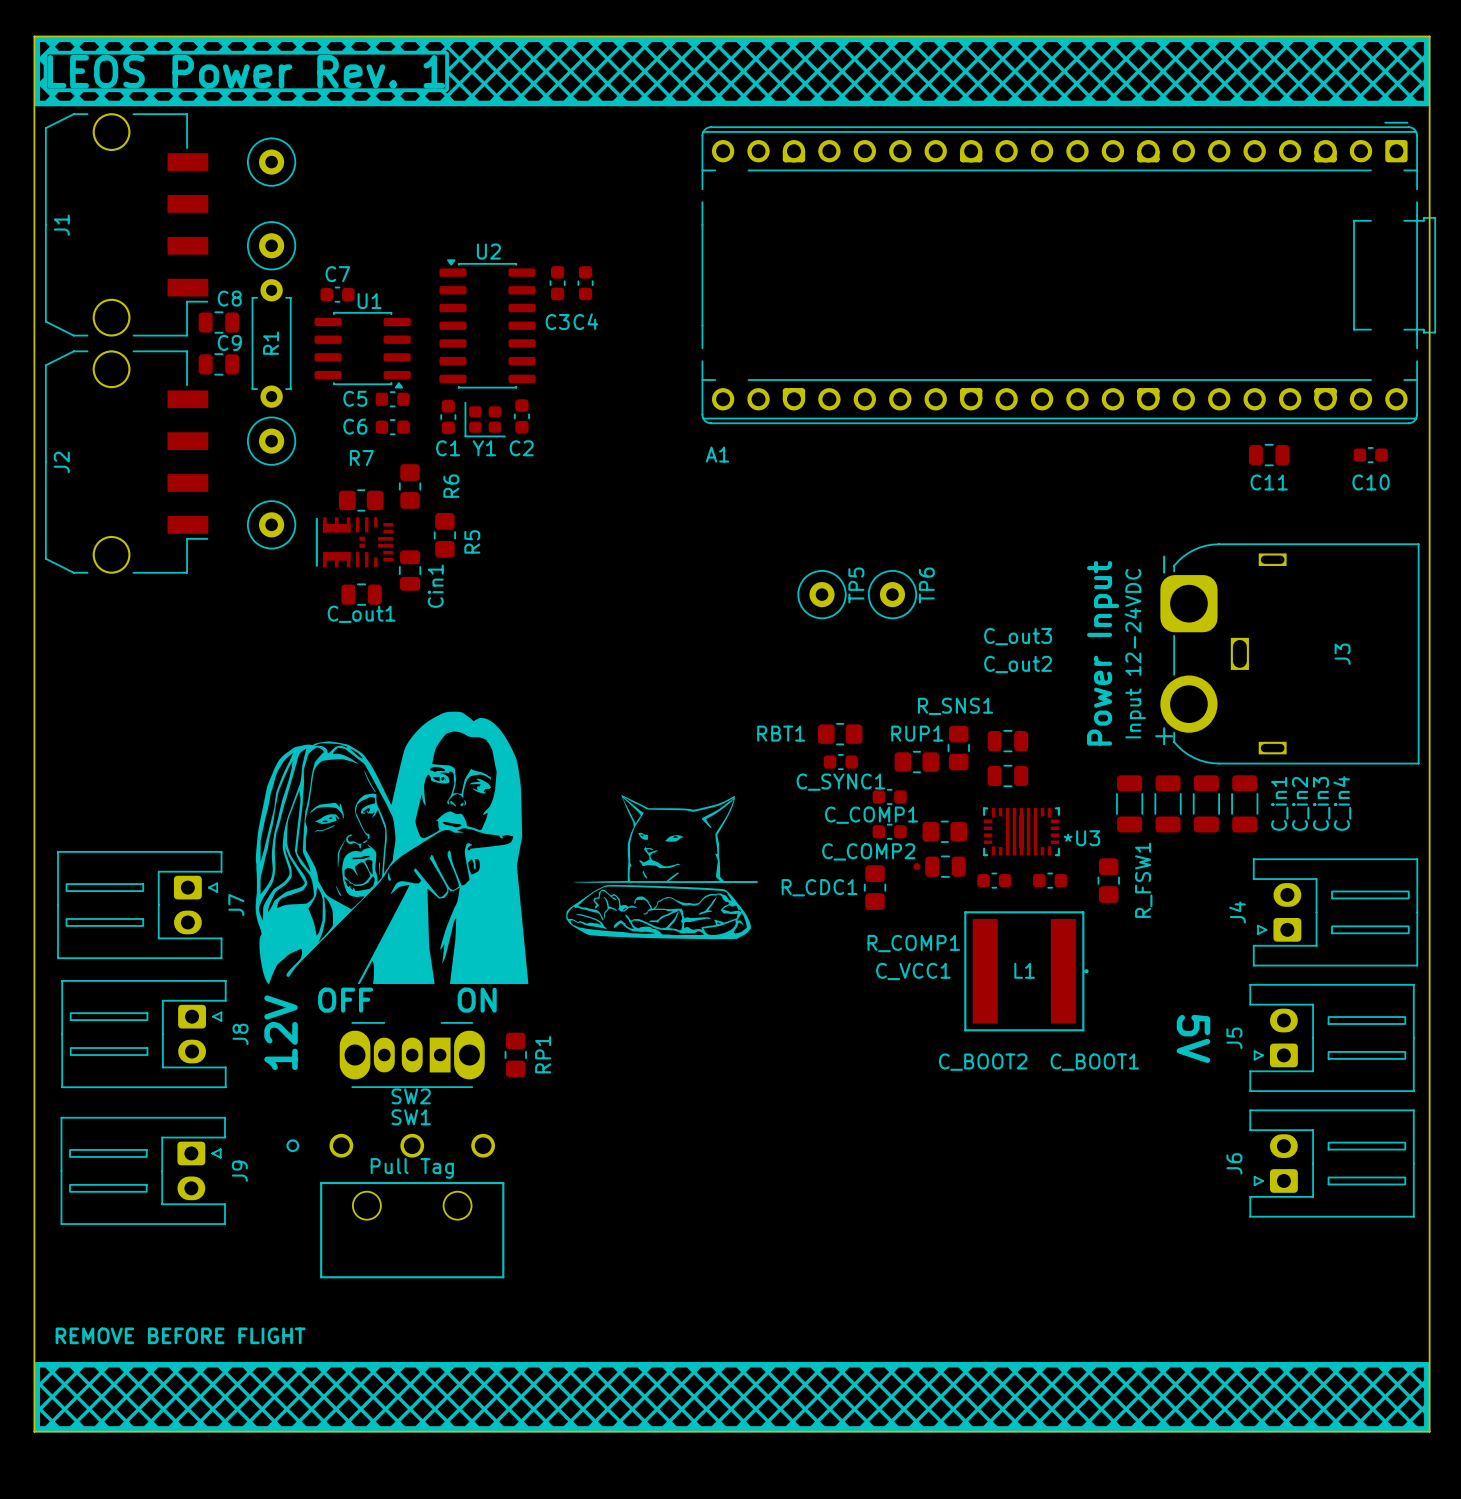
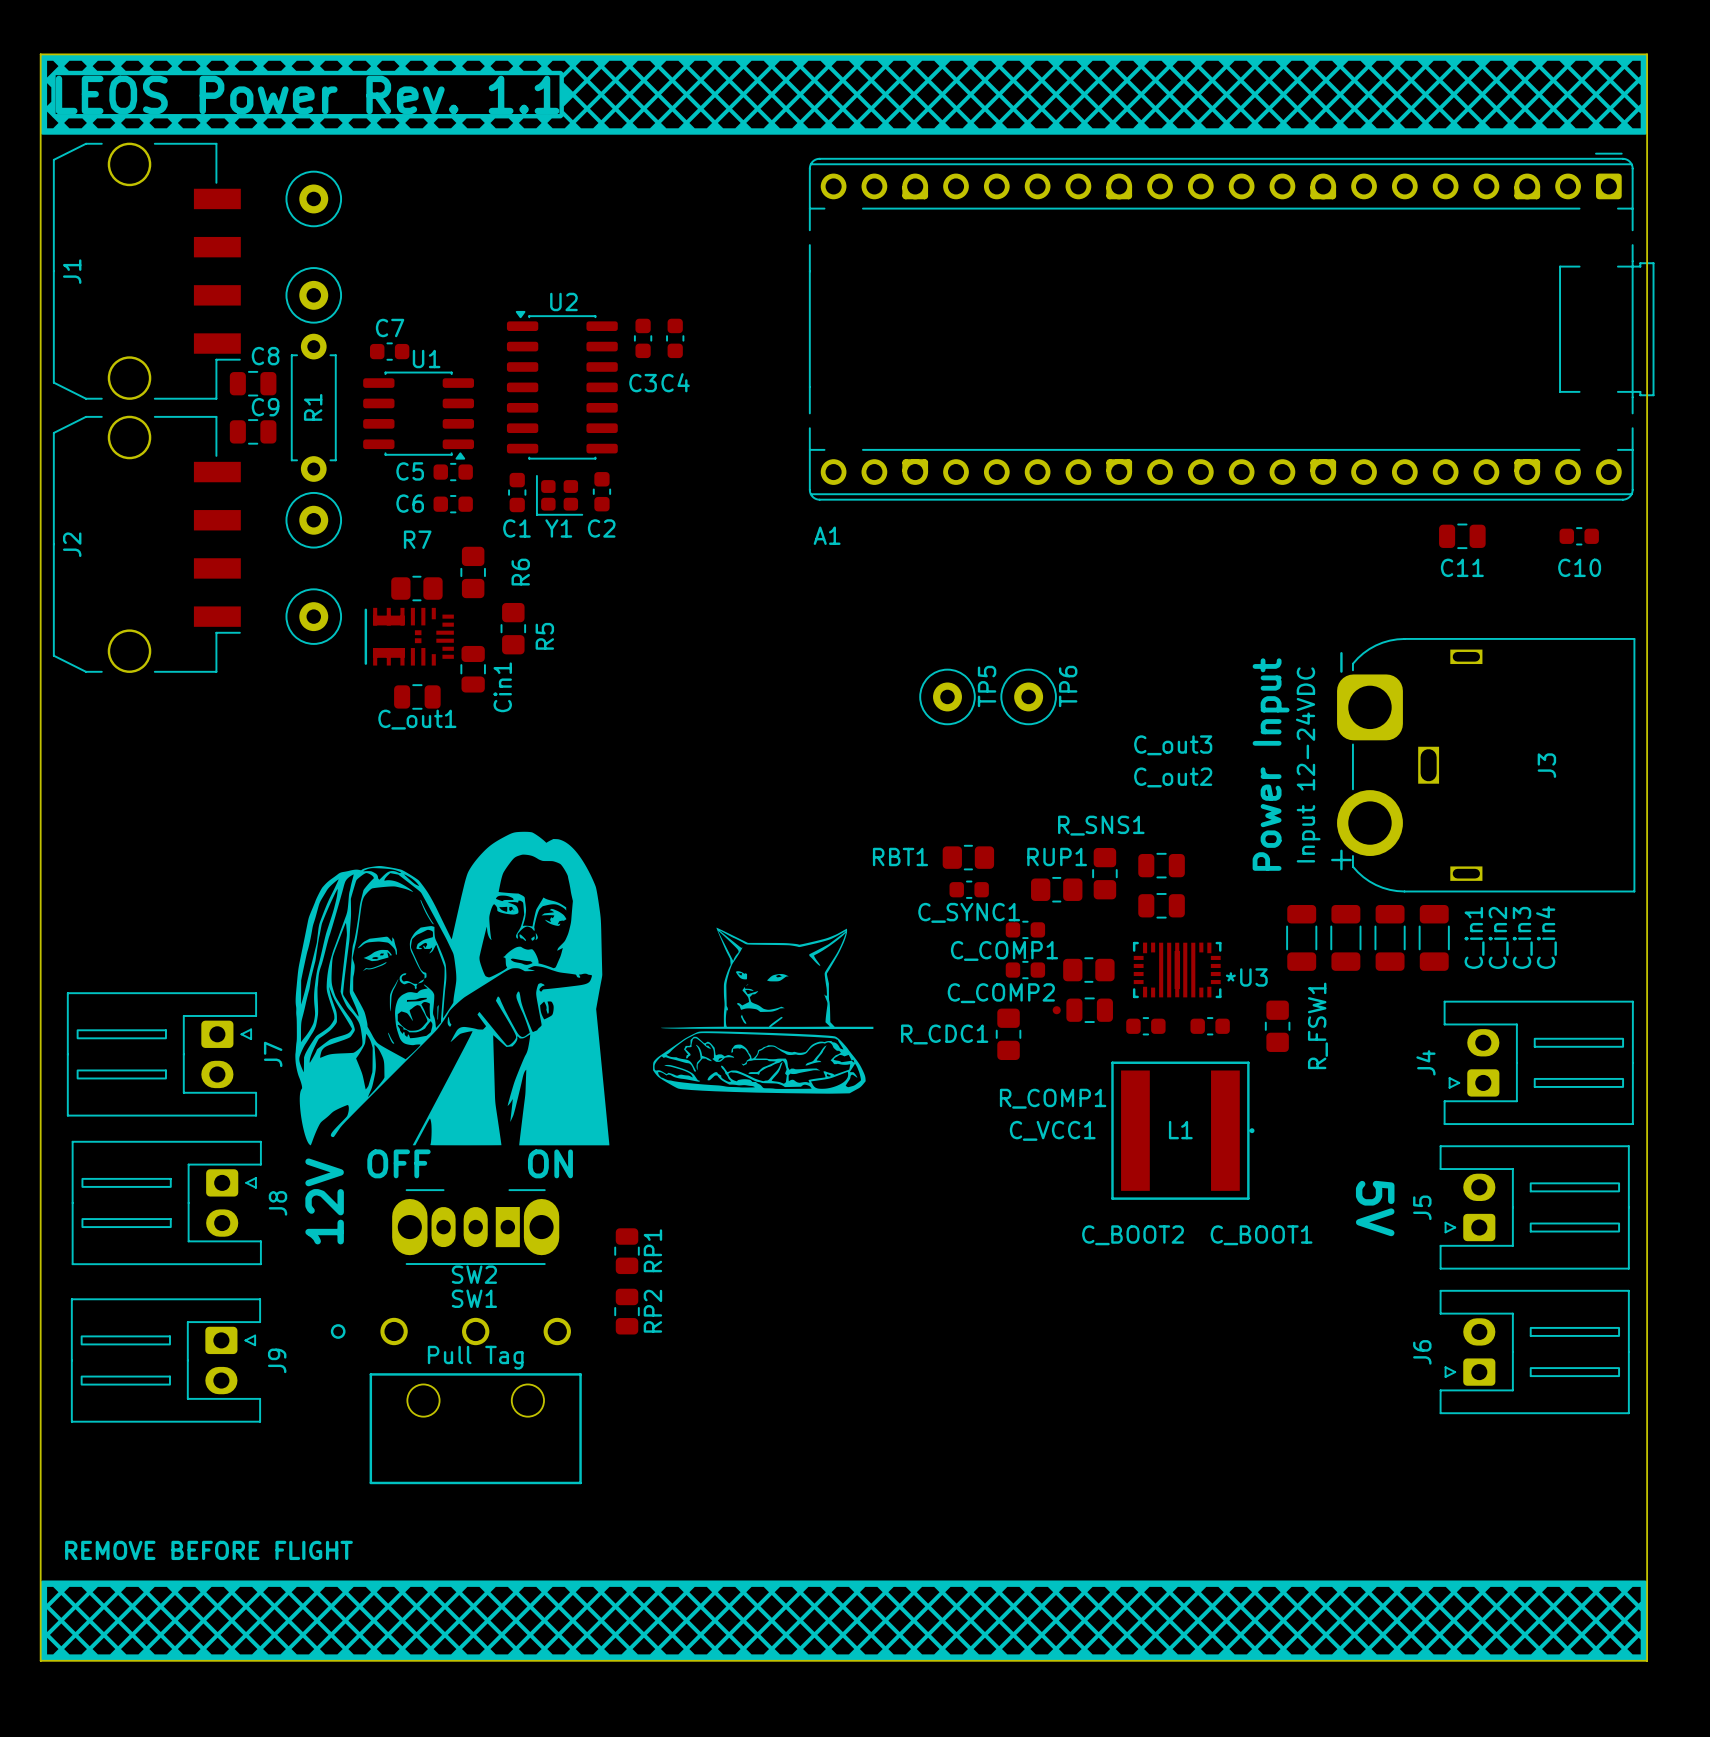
drawing shape: [34, 36, 1430, 107] -> [40, 54, 1648, 135]
text: LEOS Power Rev. 1 (246, 71) -> LEOS Power Rev. 1.1 (307, 94)
RP1 footprint: [504, 1032, 527, 1078] -> [614, 1228, 640, 1275]
RP2: none -> (627, 1311)

